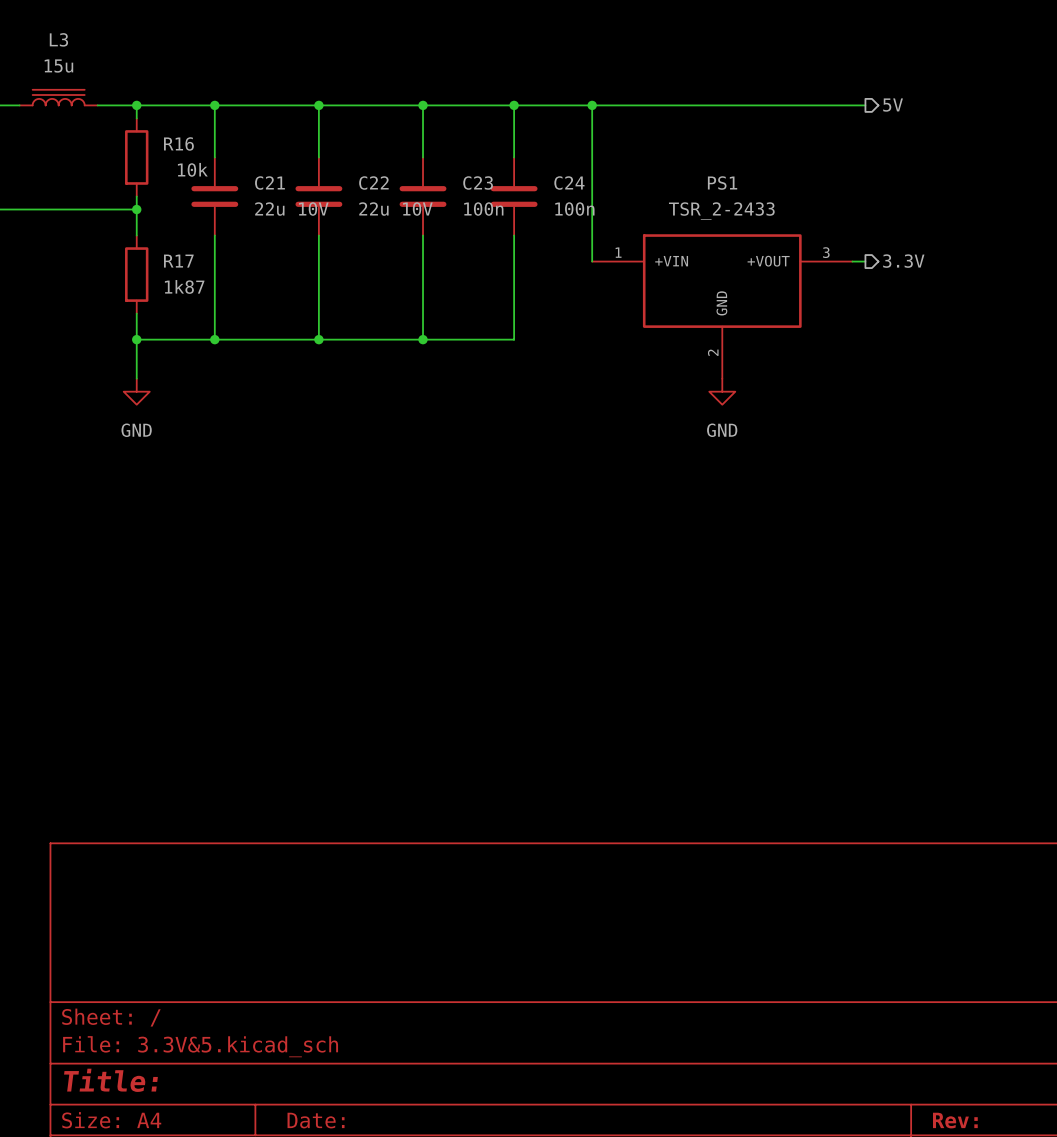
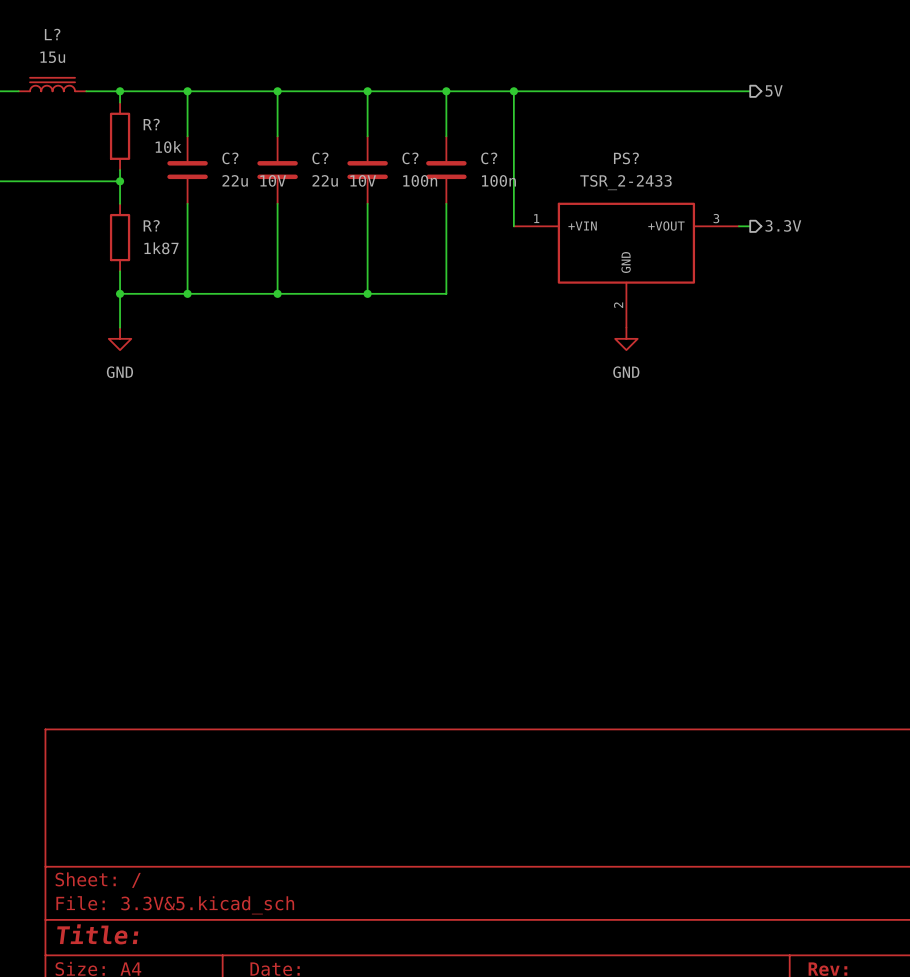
L3 name: L3 (58, 39) -> L? (52, 34)
R16 name: R16 (178, 143) -> R? (151, 124)
C21 name: C21 (269, 183) -> C? (230, 158)
C22 name: C22 (373, 183) -> C? (320, 158)
C23 name: C23 (478, 183) -> C? (410, 158)
C24 name: C24 (569, 183) -> C? (489, 158)
PS1 name: PS1 (722, 183) -> PS? (626, 158)
R17 name: R17 (178, 261) -> R? (151, 225)

